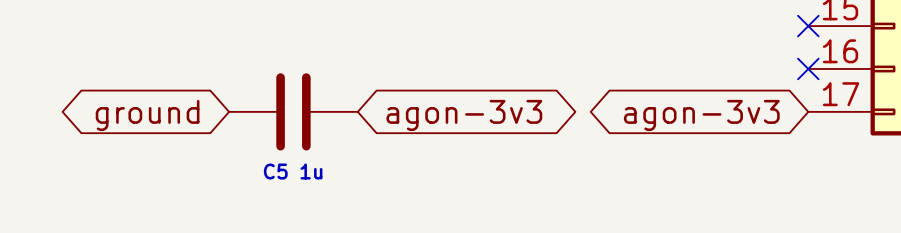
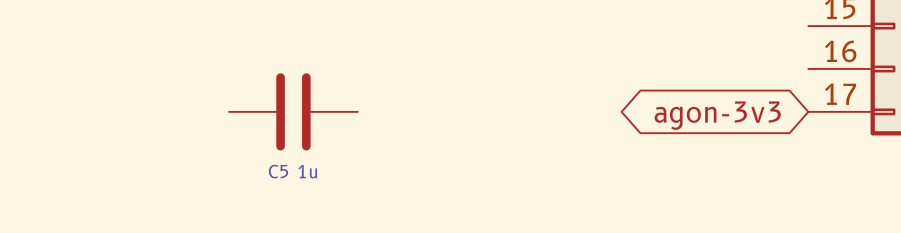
no-connect mark: (808, 26) -> none
no-connect mark: (808, 68) -> none
global label: ground (147, 115) -> none
global label: agon-3v3 (464, 115) -> none

